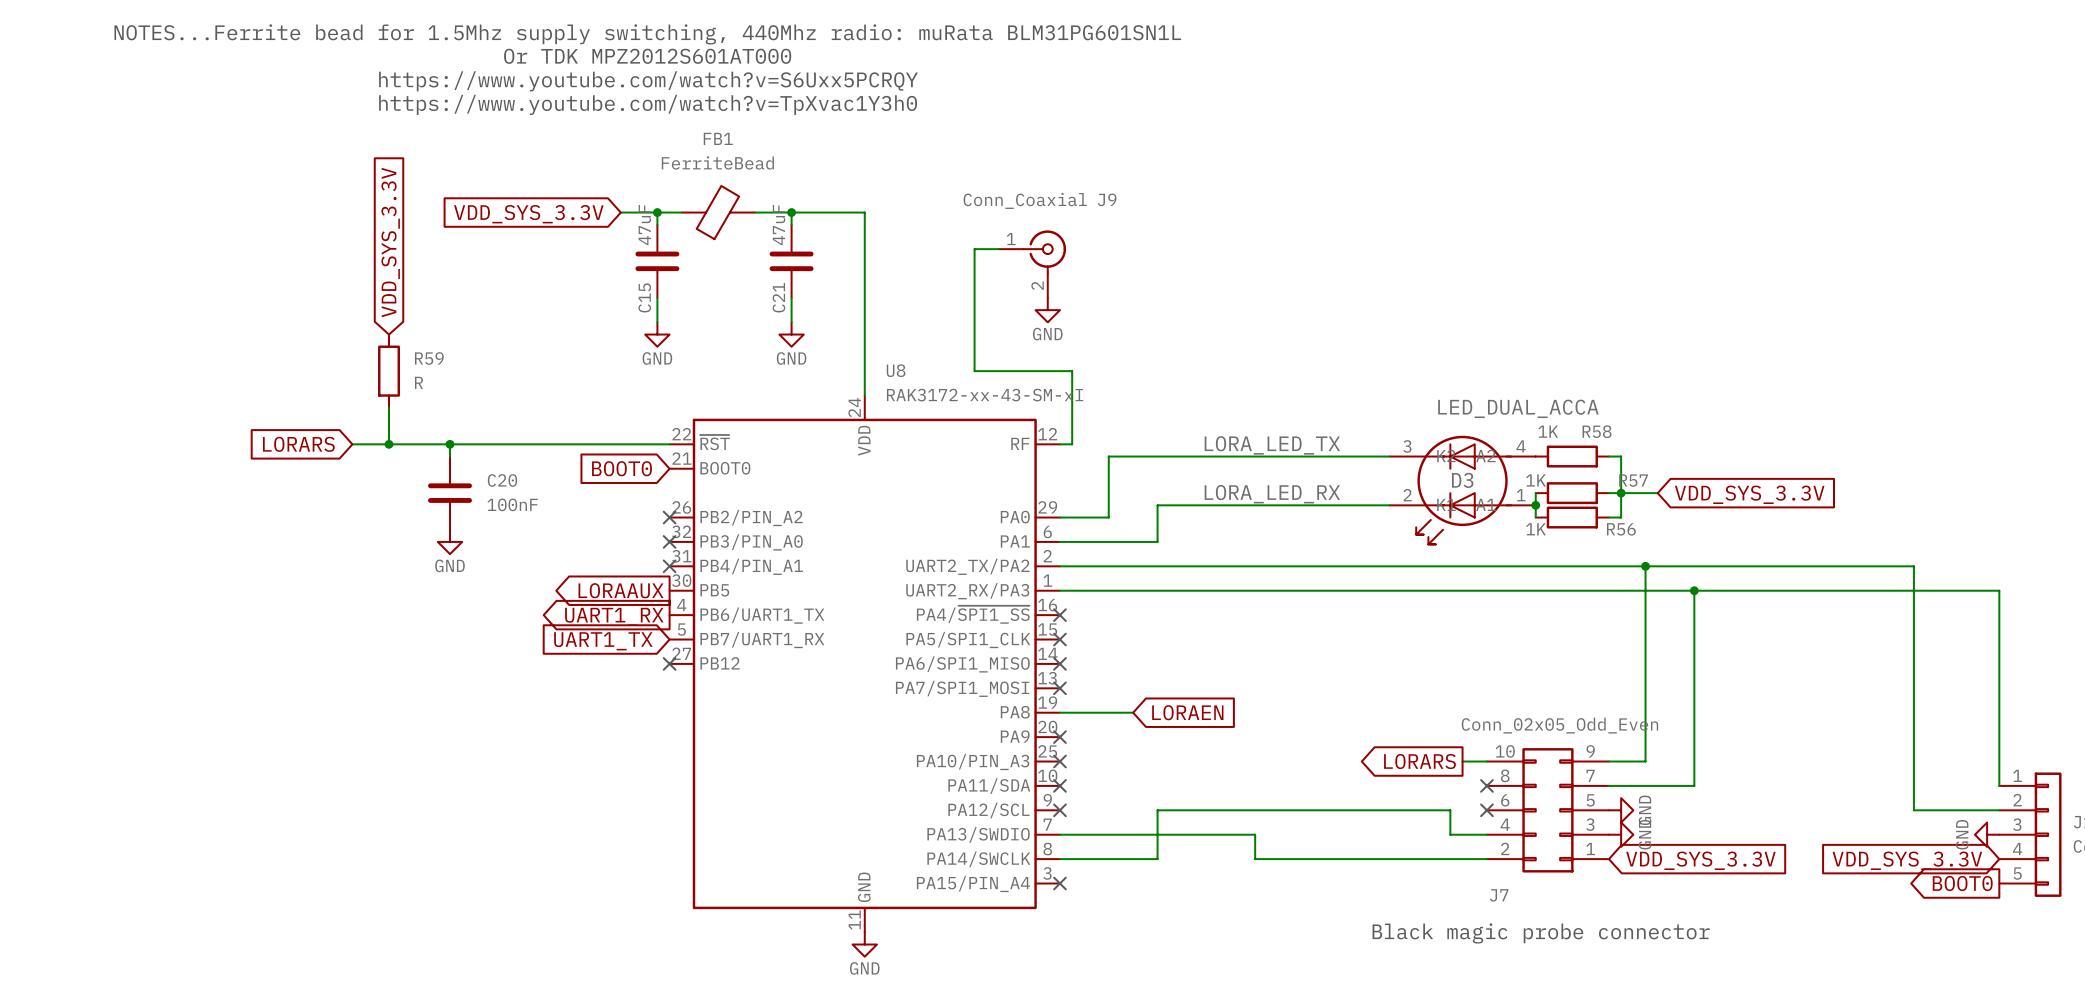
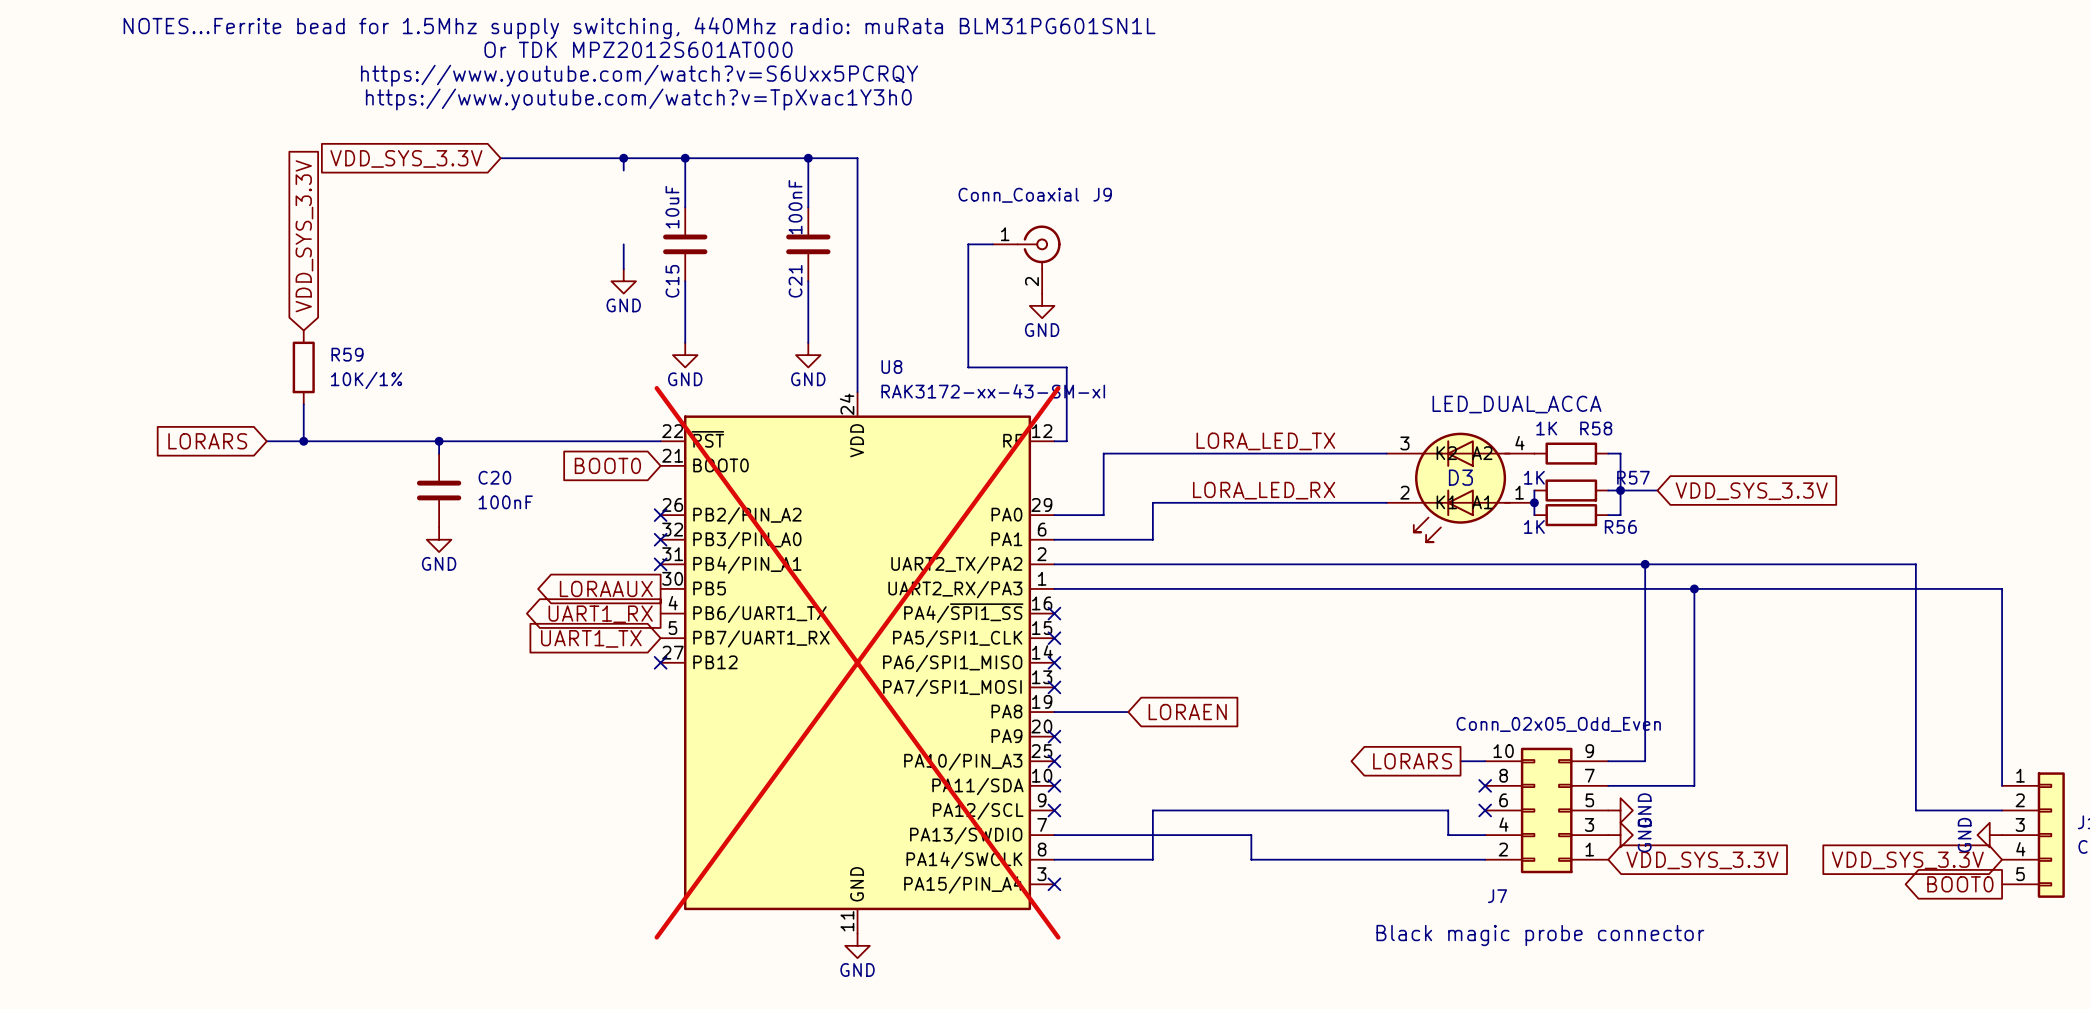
junction: none -> (623, 158)
wire: none -> (685, 158) (685, 207)
junction: none -> (685, 158)
wire: none -> (808, 158) (808, 207)
junction: none -> (808, 158)
global label: none -> VDD_SYS_3.3V (406, 158)
wire: (620, 212) (681, 212) -> none
wire: (657, 212) (657, 224) -> (623, 158) (623, 170)
junction: (657, 212) -> none
FB1: FerriteBead (718, 212) -> none
wire: (754, 212) (864, 212) -> (500, 158) (857, 158) (857, 207)
wire: (791, 212) (791, 224) -> none
junction: (791, 212) -> none
global label: VDD_SYS_3.3V (528, 214) -> none
C15 value: 47uF (644, 225) -> 10uF (672, 207)
C21 value: 47uF (779, 225) -> 100nF (795, 207)
global label position: VDD_SYS_3.3V (390, 242) -> VDD_SYS_3.3V (304, 236)
C15 position: (657, 261) -> (685, 244)
C21 position: (791, 261) -> (808, 244)
power symbol: none -> GND (623, 281)
wire: none -> (685, 281) (685, 342)
wire: none -> (808, 281) (808, 342)
wire: (657, 297) (657, 322) -> (623, 244) (623, 268)
wire: (791, 297) (791, 322) -> none
power symbol: GND (657, 334) -> none
power symbol position: GND (791, 334) -> GND (808, 355)
power symbol: none -> GND (685, 355)
R59 position: (389, 371) -> (303, 367)
R59 value: R (418, 382) -> 10K/1% (366, 380)
wire: (389, 407) (389, 444) -> (303, 404) (303, 441)
wire: none -> (266, 441) (340, 441)
global label position: LORARS (298, 444) -> LORARS (207, 441)
junction: none -> (303, 441)
junction: (389, 444) -> none
U8 do-not-place cross: none -> (857, 662)

